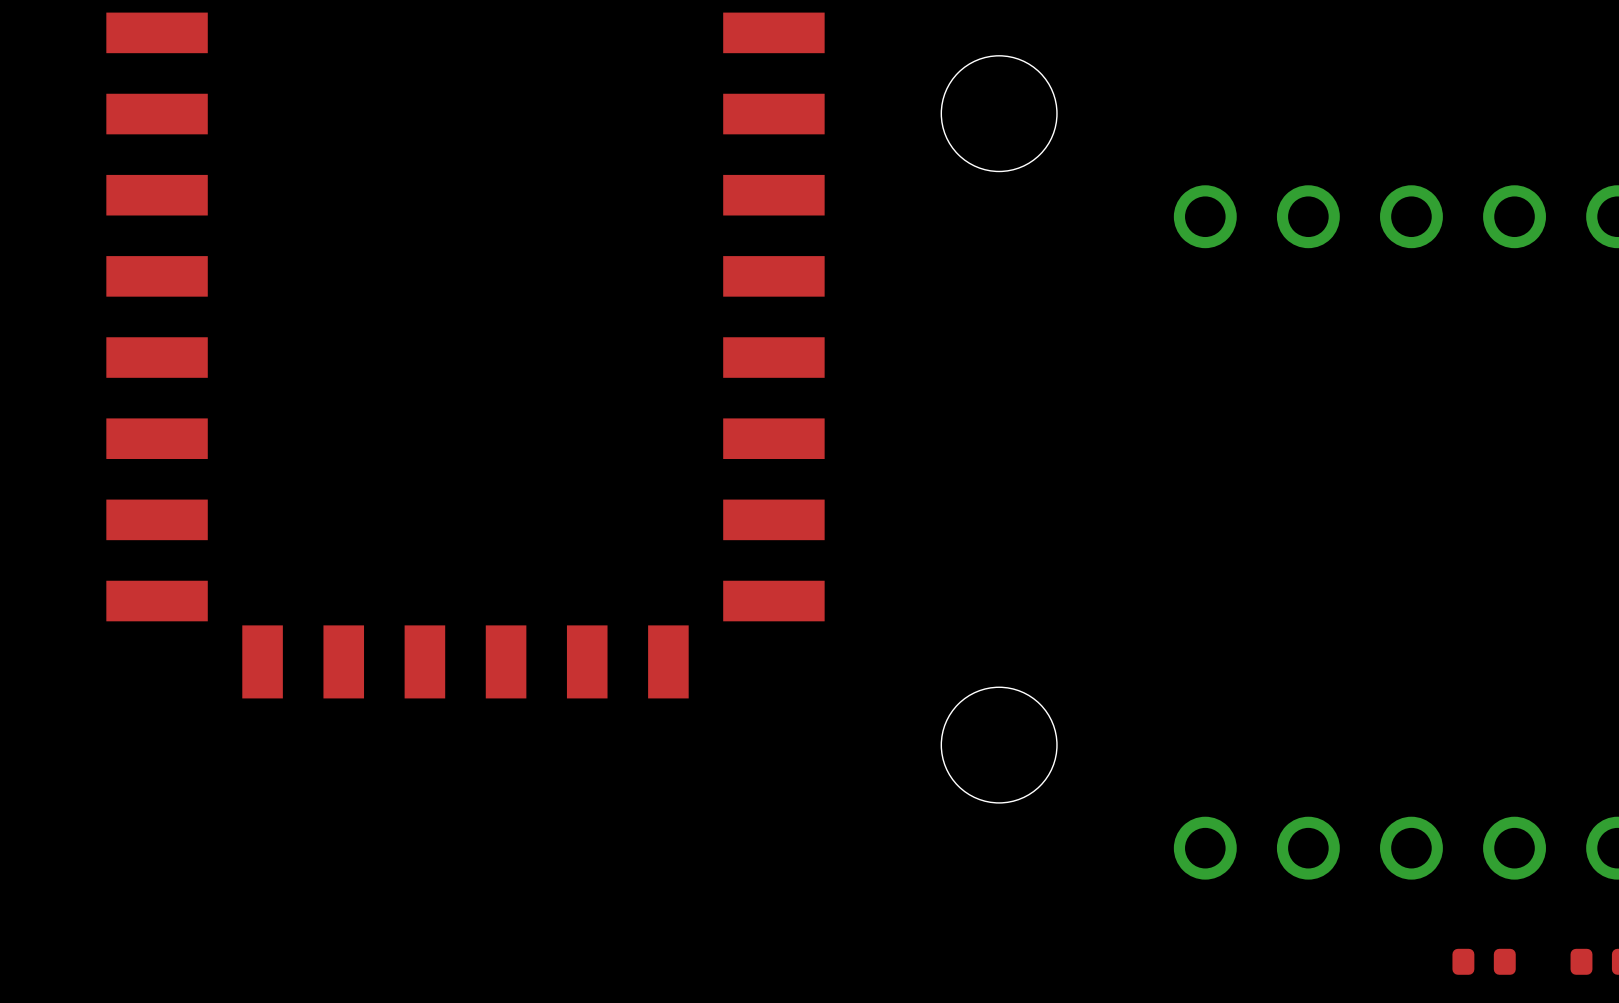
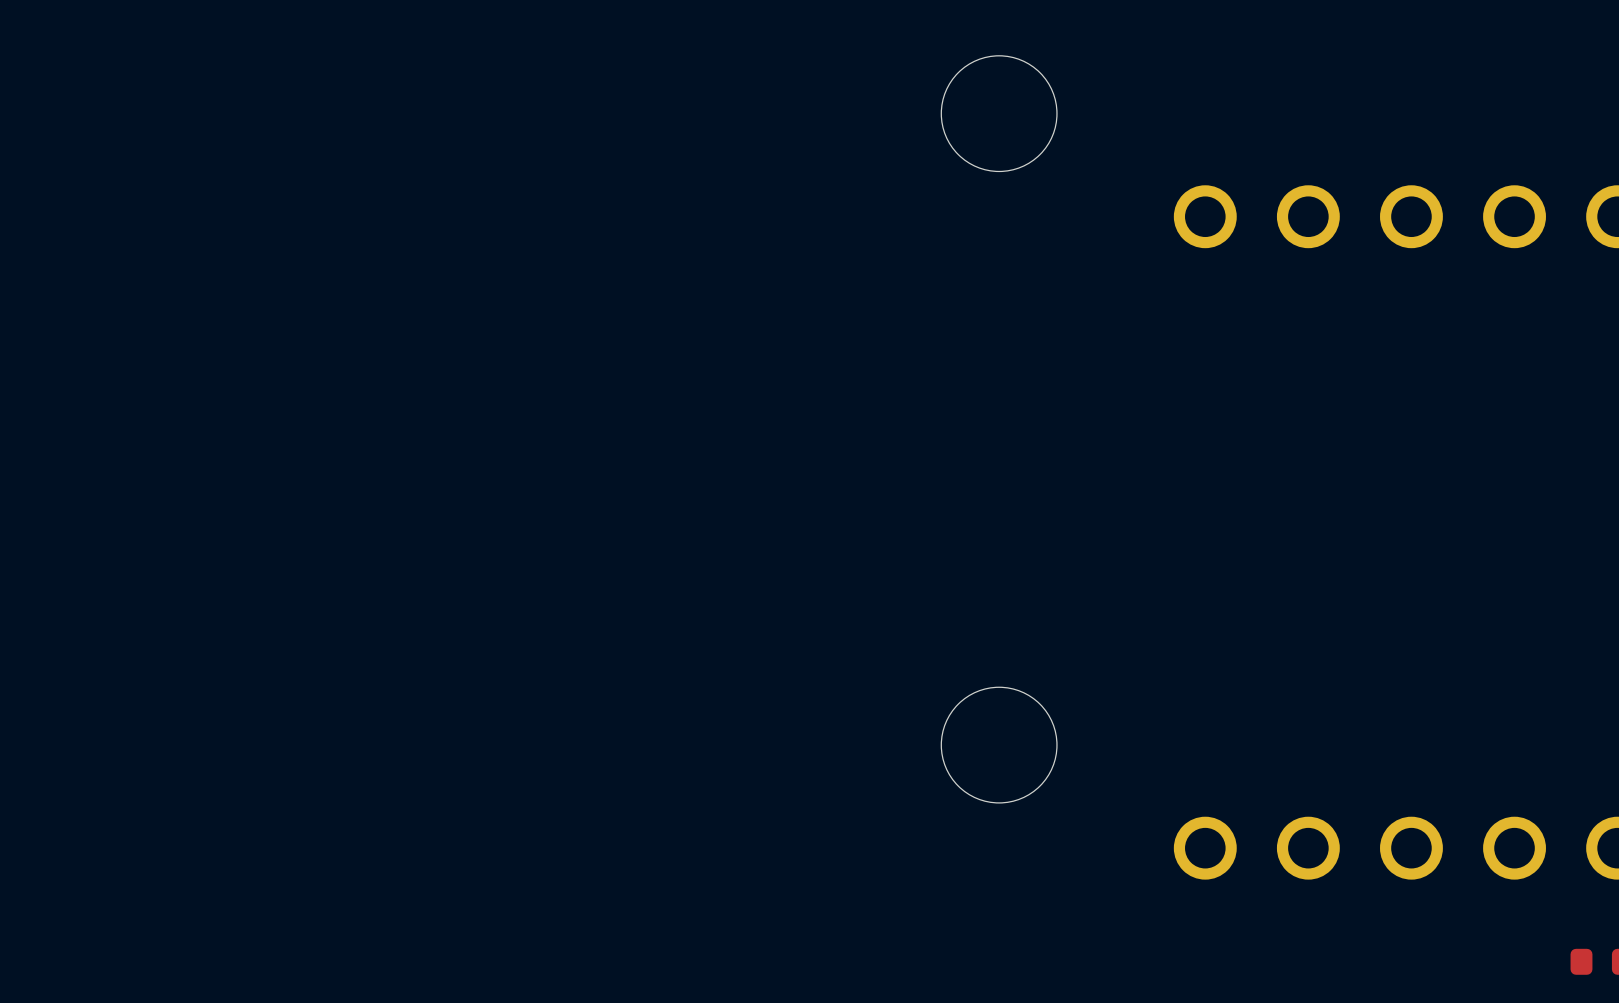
part: (465, 355) -> none
part: (1484, 961) -> none

